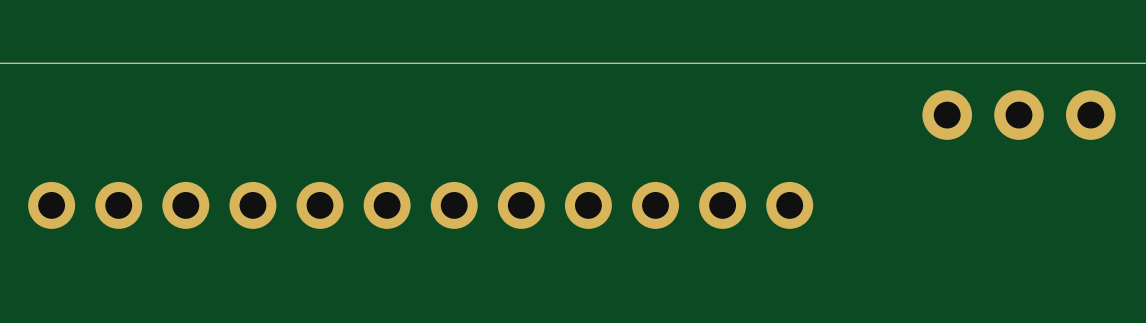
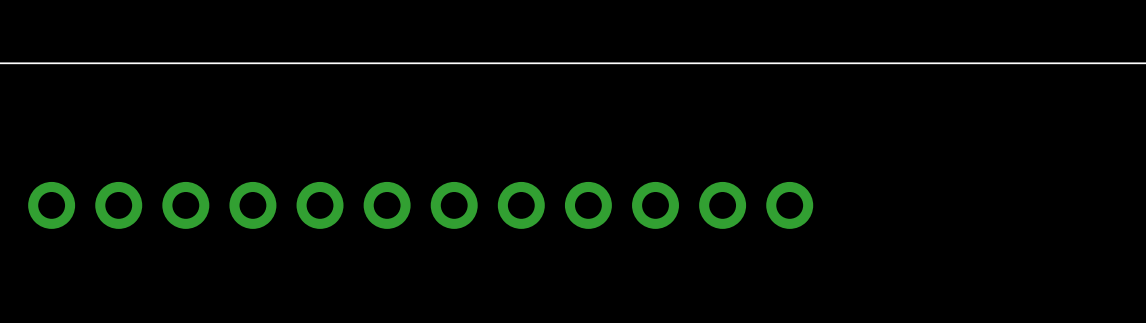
part: (1019, 115) -> none

